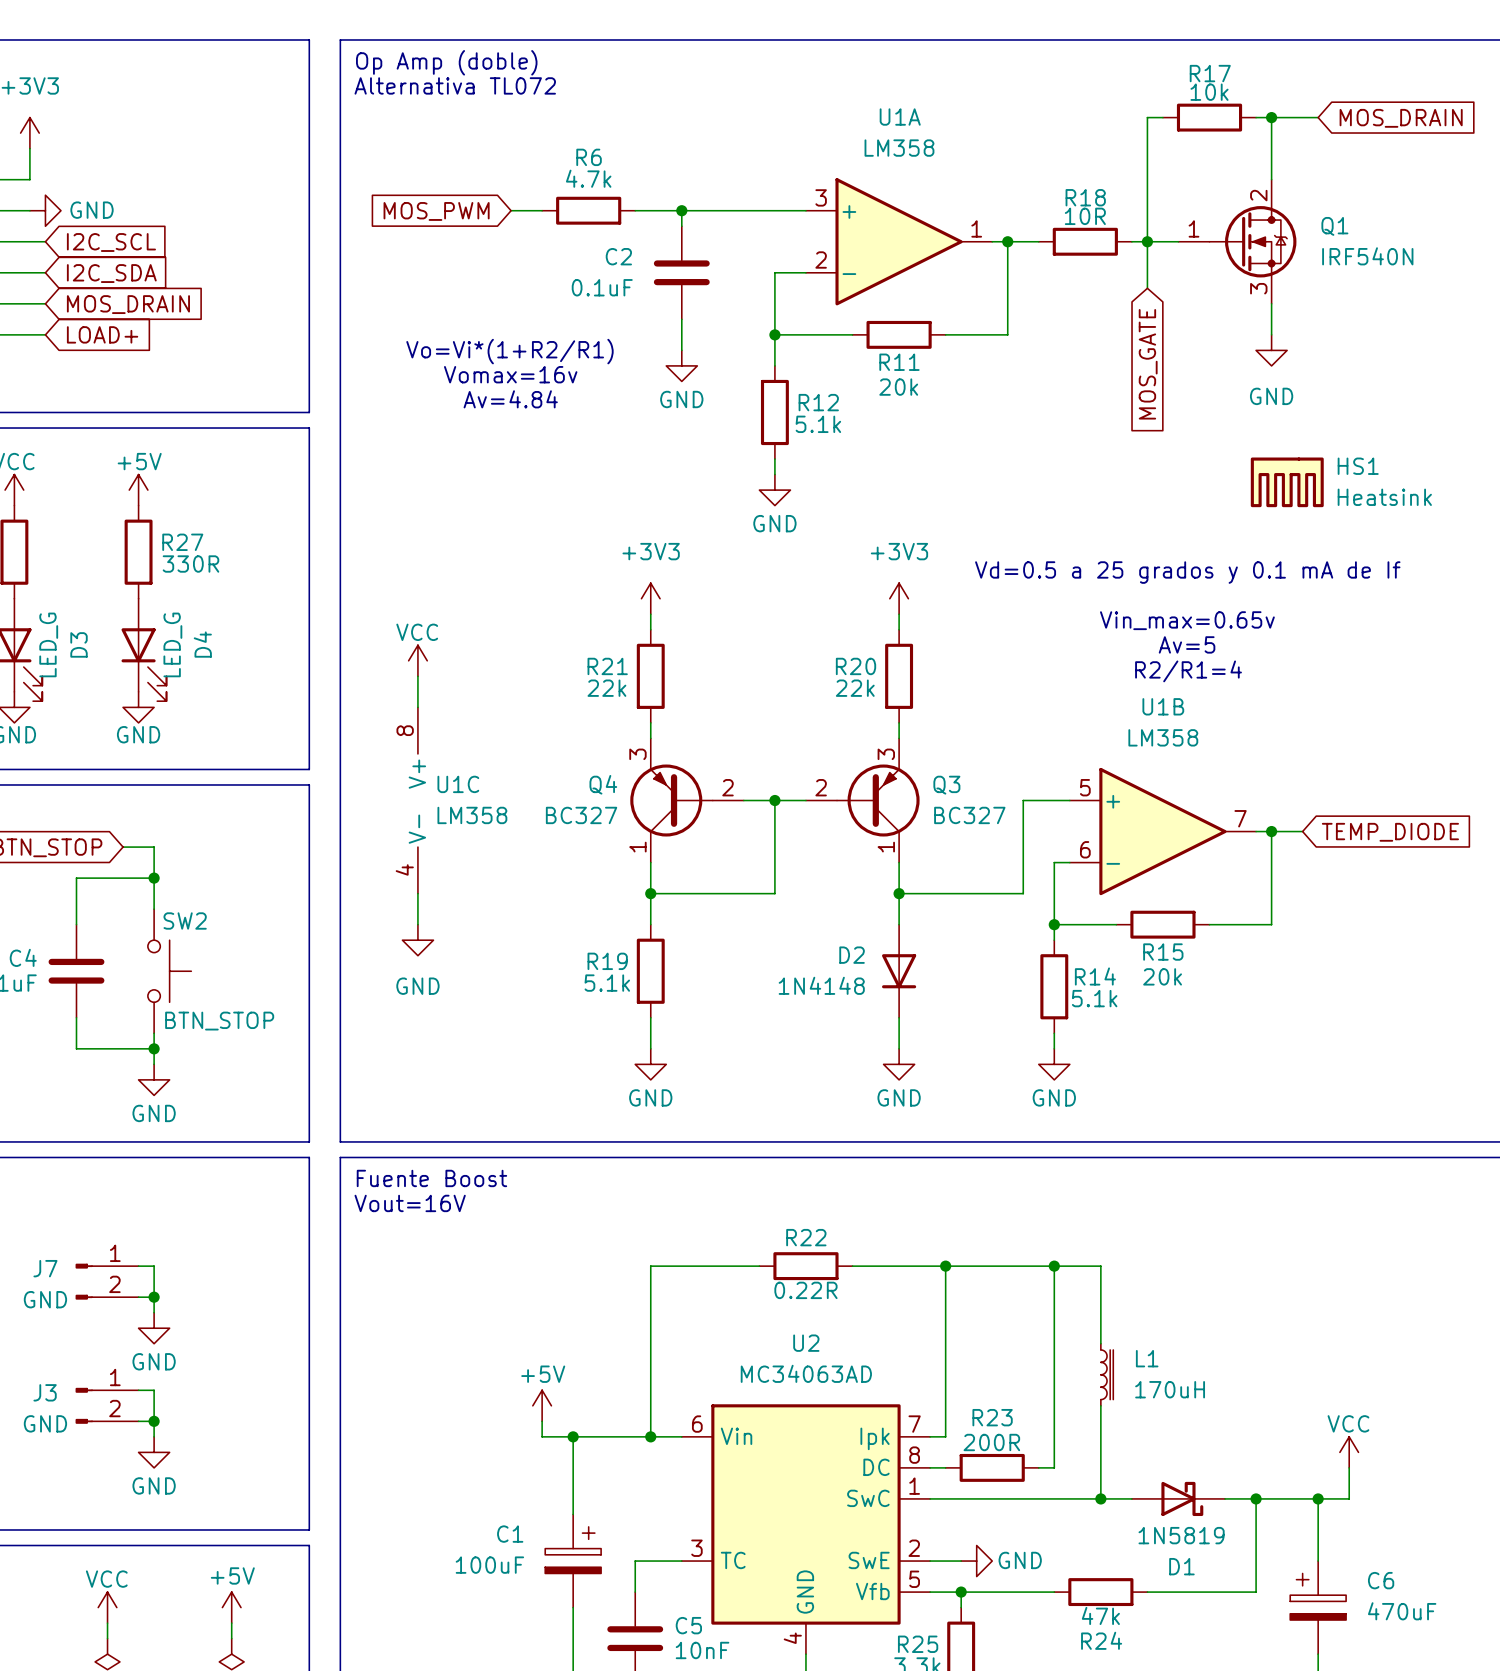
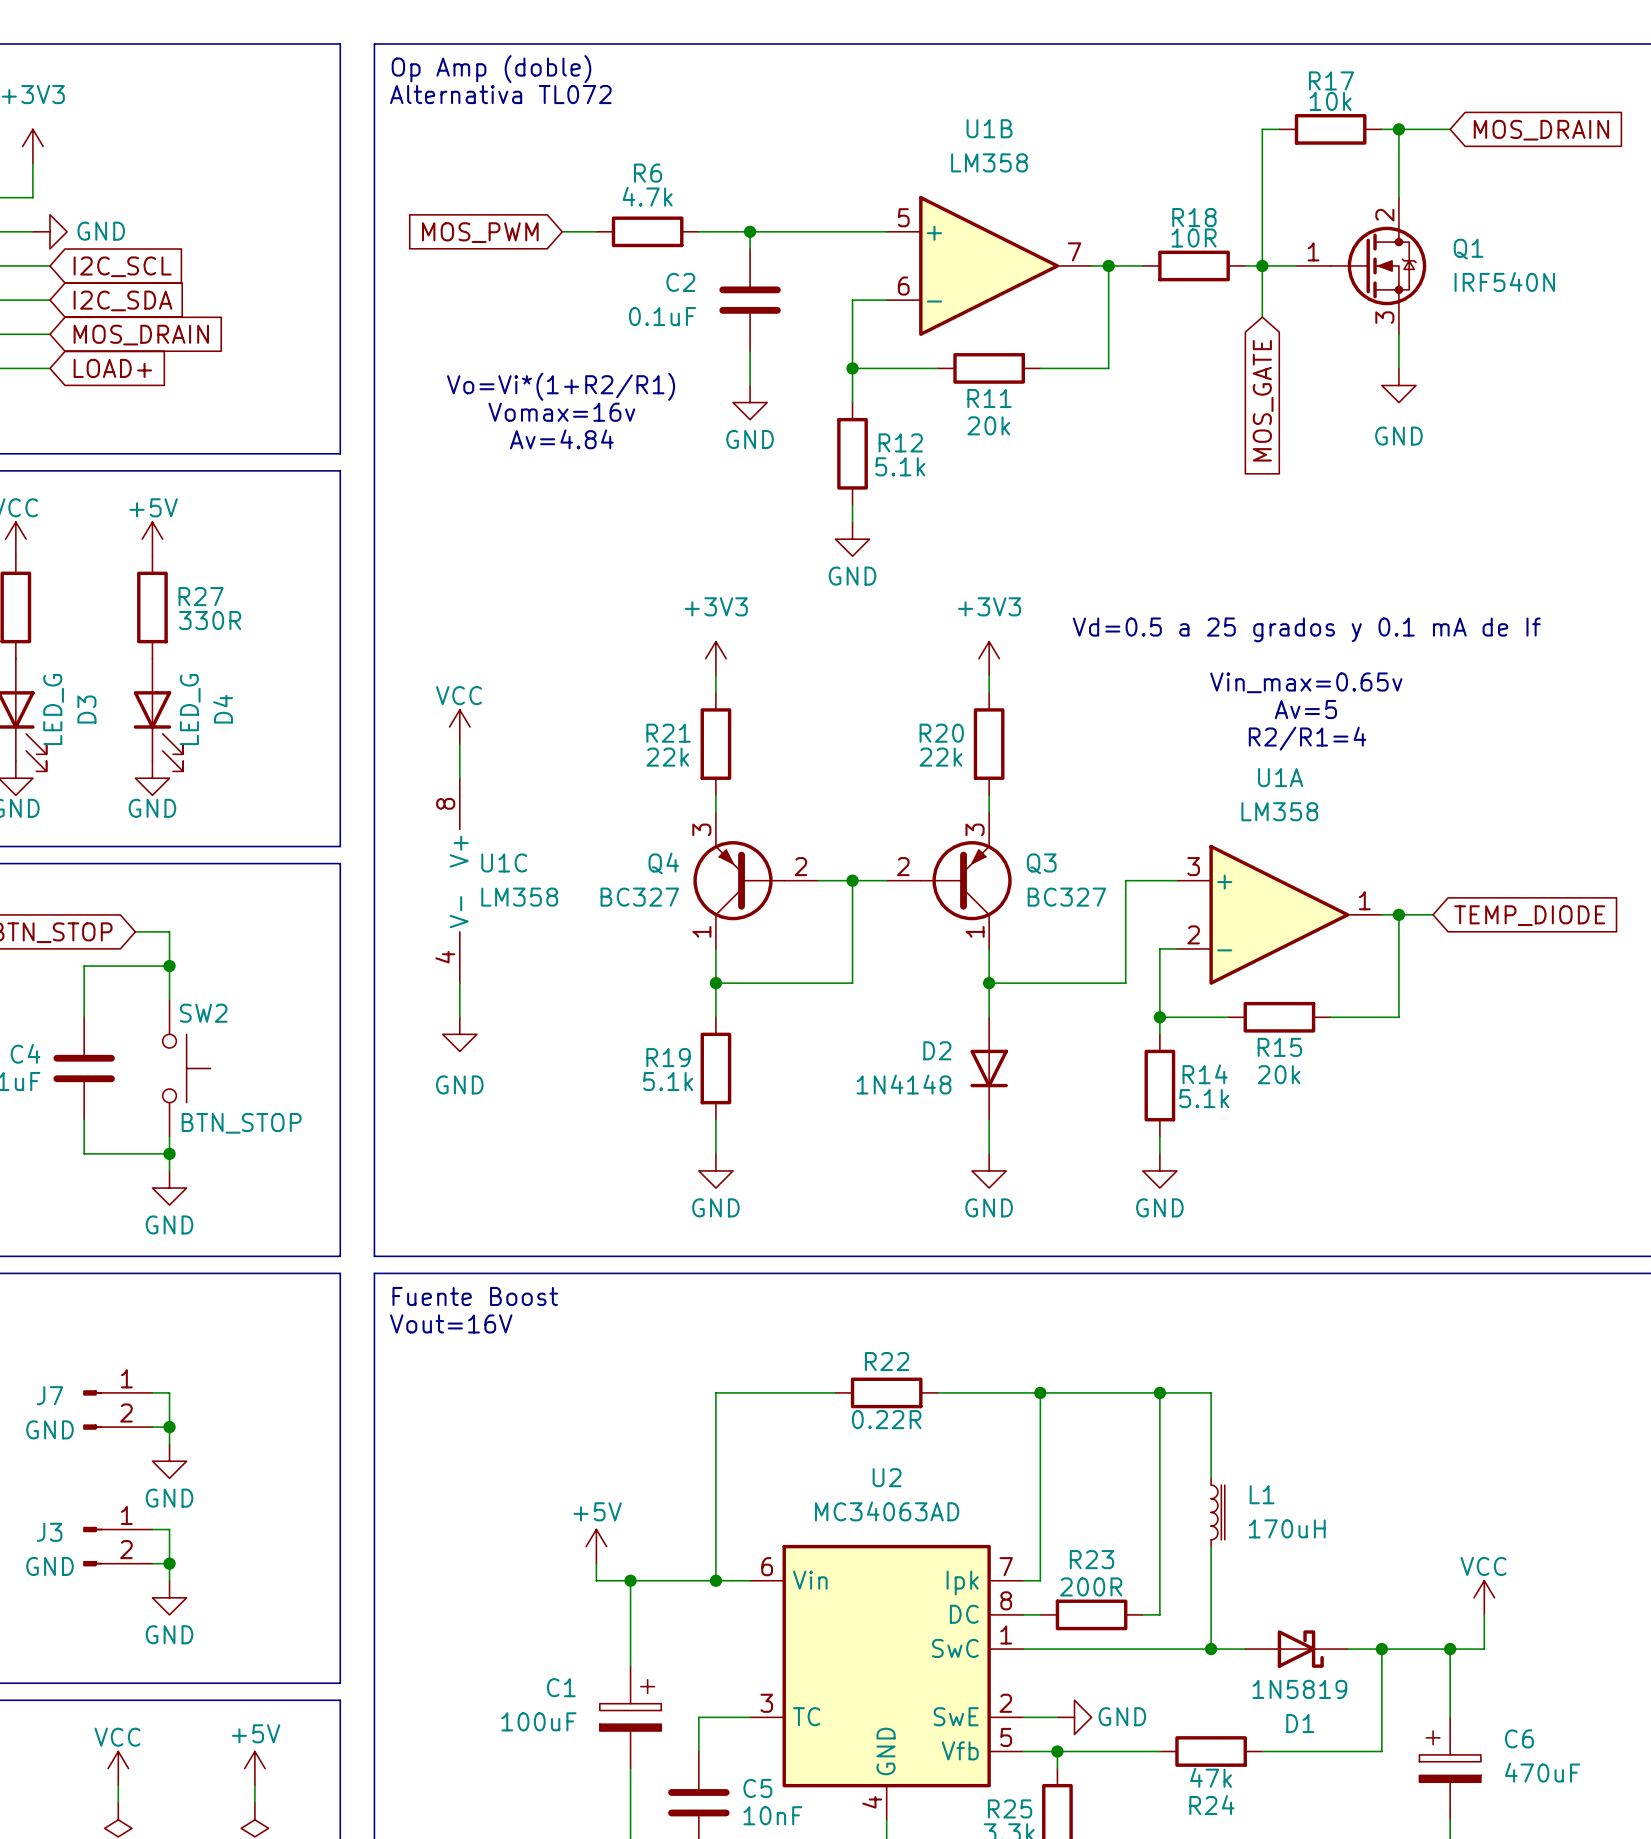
U1A position: (899, 241) -> (1279, 914)
HS1: Heatsink (1287, 482) -> none
U1B position: (1162, 831) -> (989, 265)

